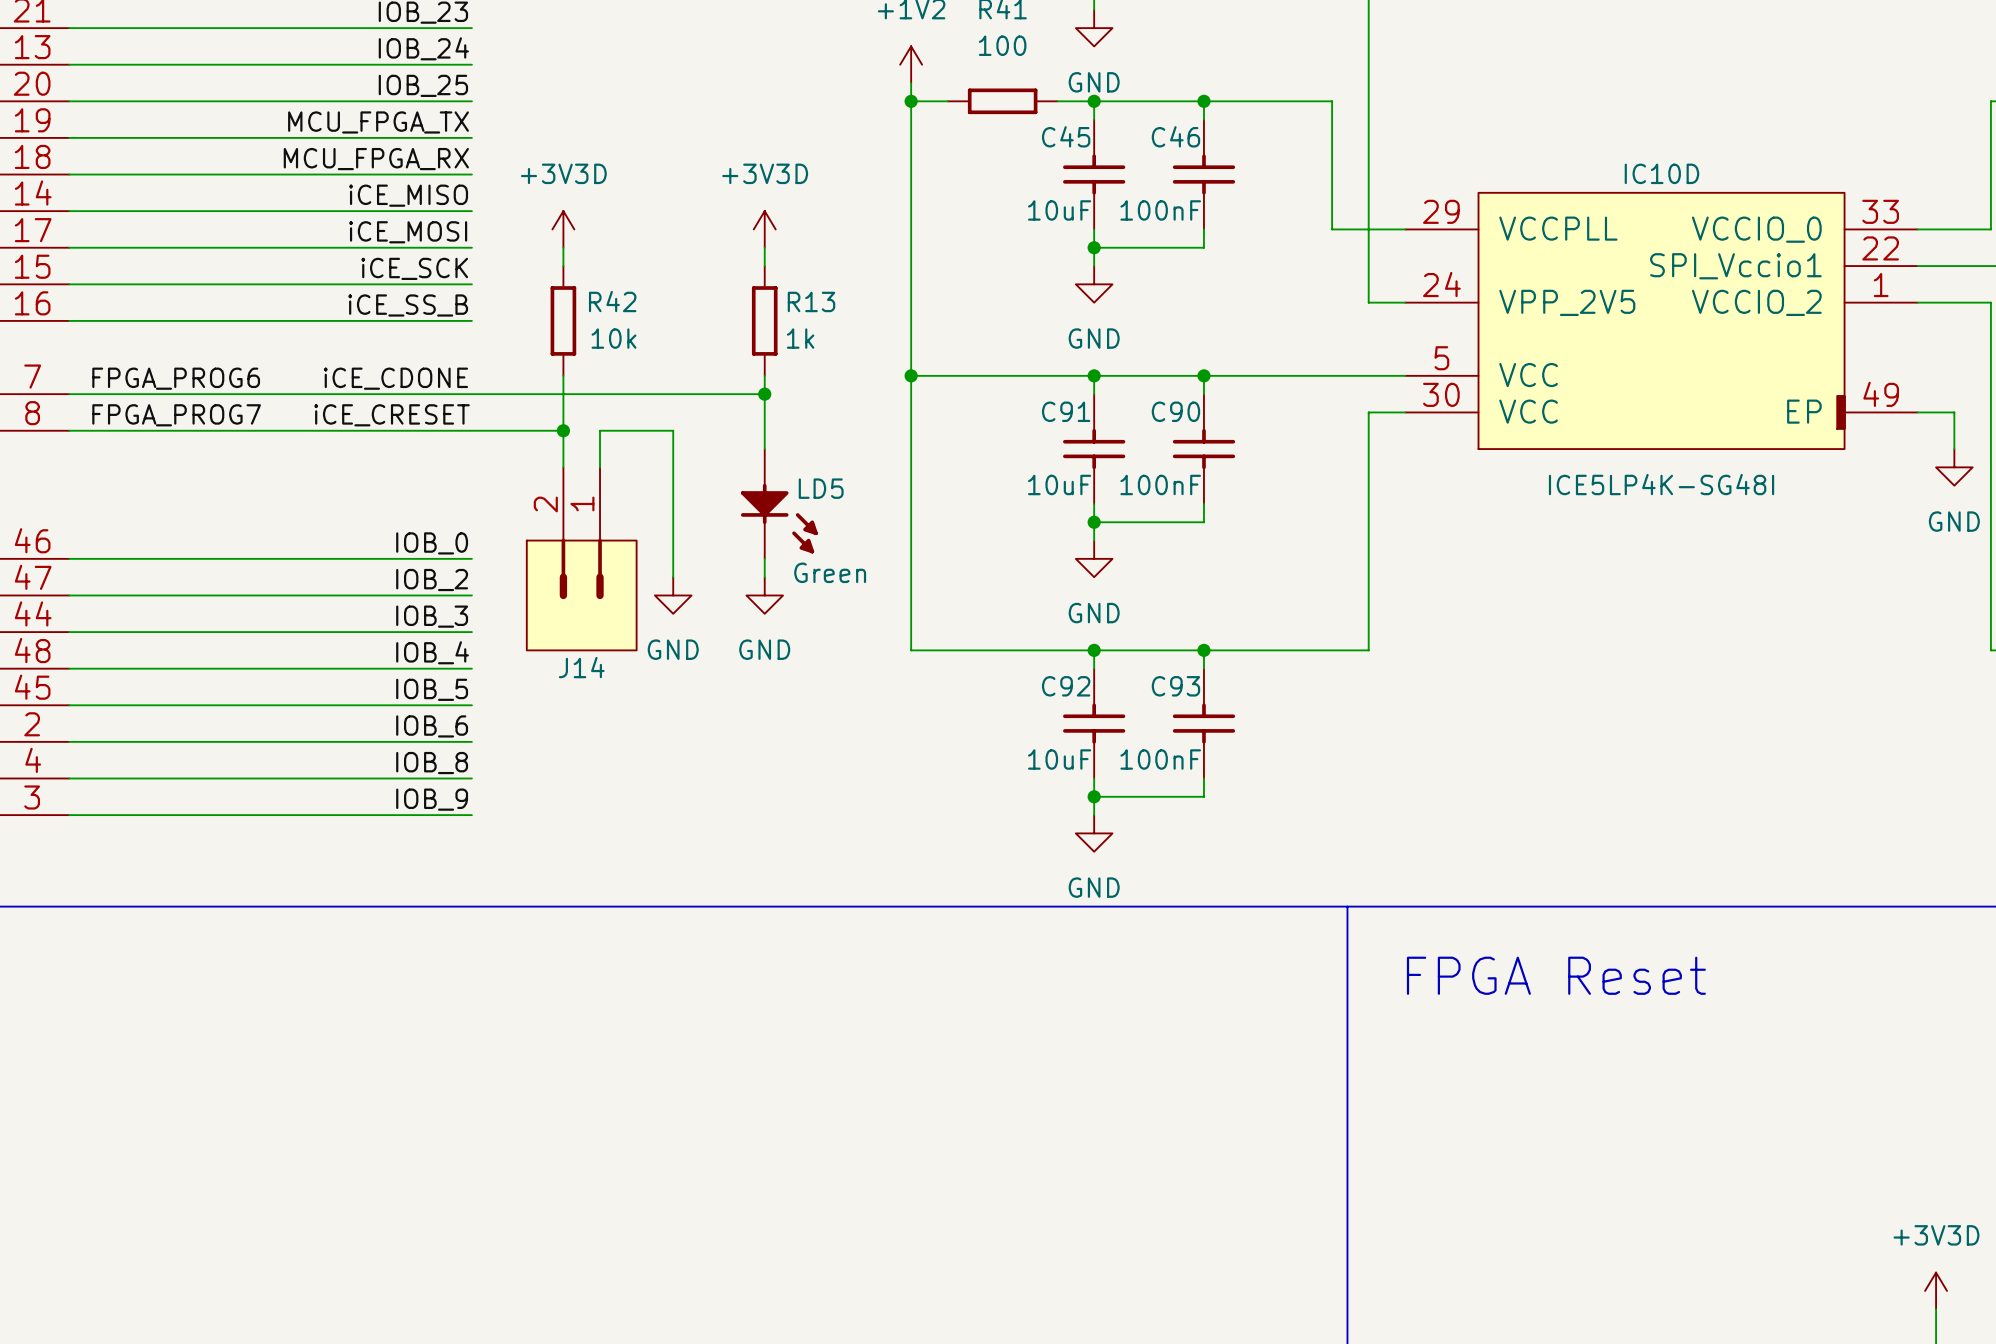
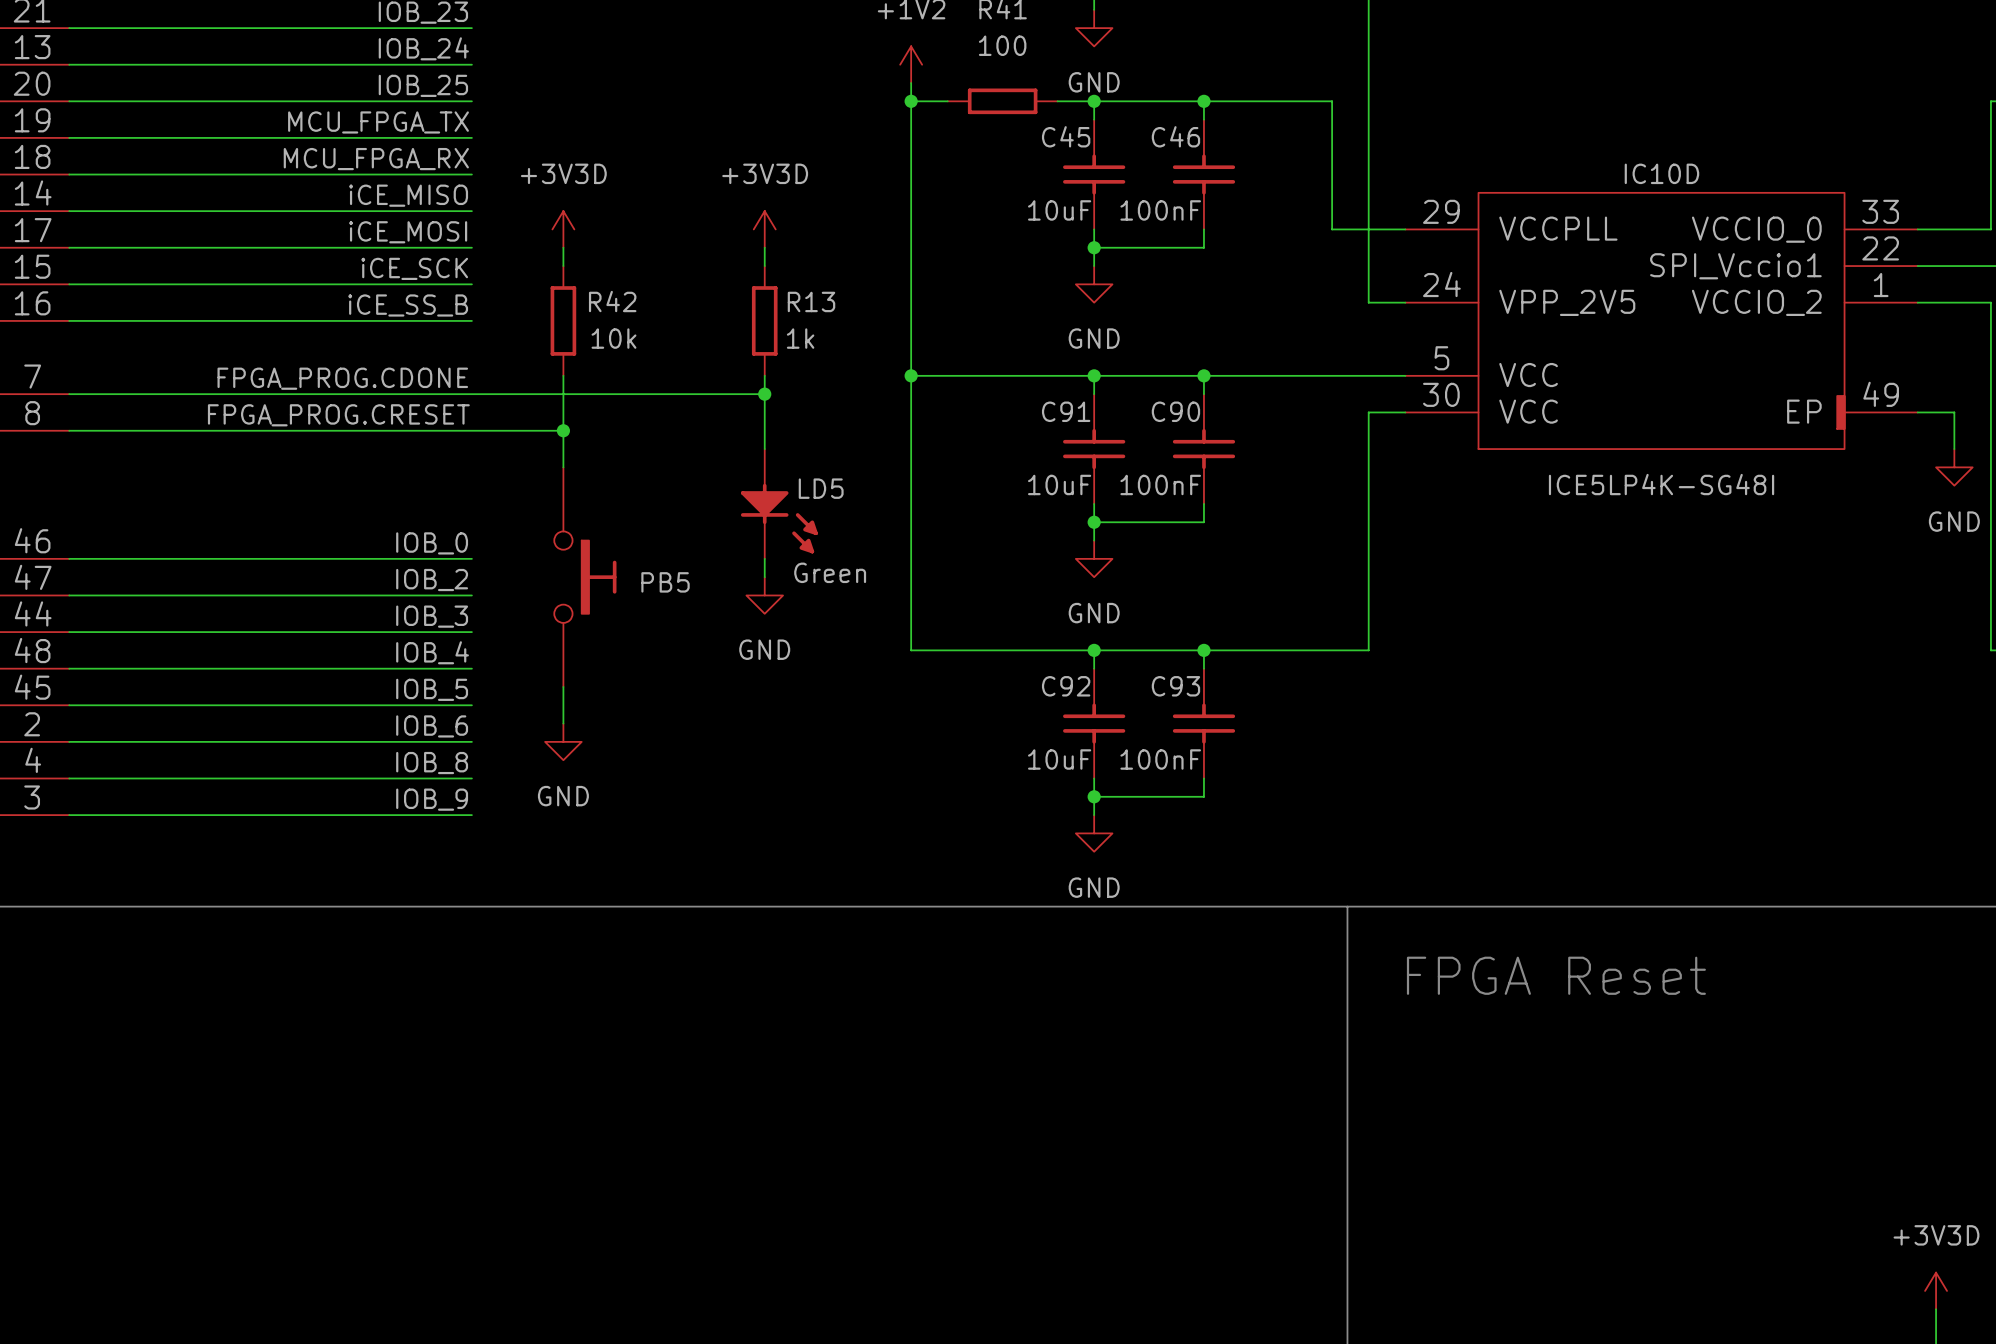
label: FPGA_PROG6 (176, 378) -> none
label: iCE_CDONE (395, 378) -> FPGA_PROG.CDONE (342, 378)
label: FPGA_PROG7 (176, 415) -> none
label: iCE_CRESET (392, 415) -> FPGA_PROG.CRESET (338, 415)
wire: (600, 467) (600, 430) (673, 430) (673, 577) -> none
J14: (581, 558) -> none
PB5: none -> (585, 577)
power symbol position: GND (673, 595) -> GND (563, 741)
wire: none -> (563, 686) (563, 723)

